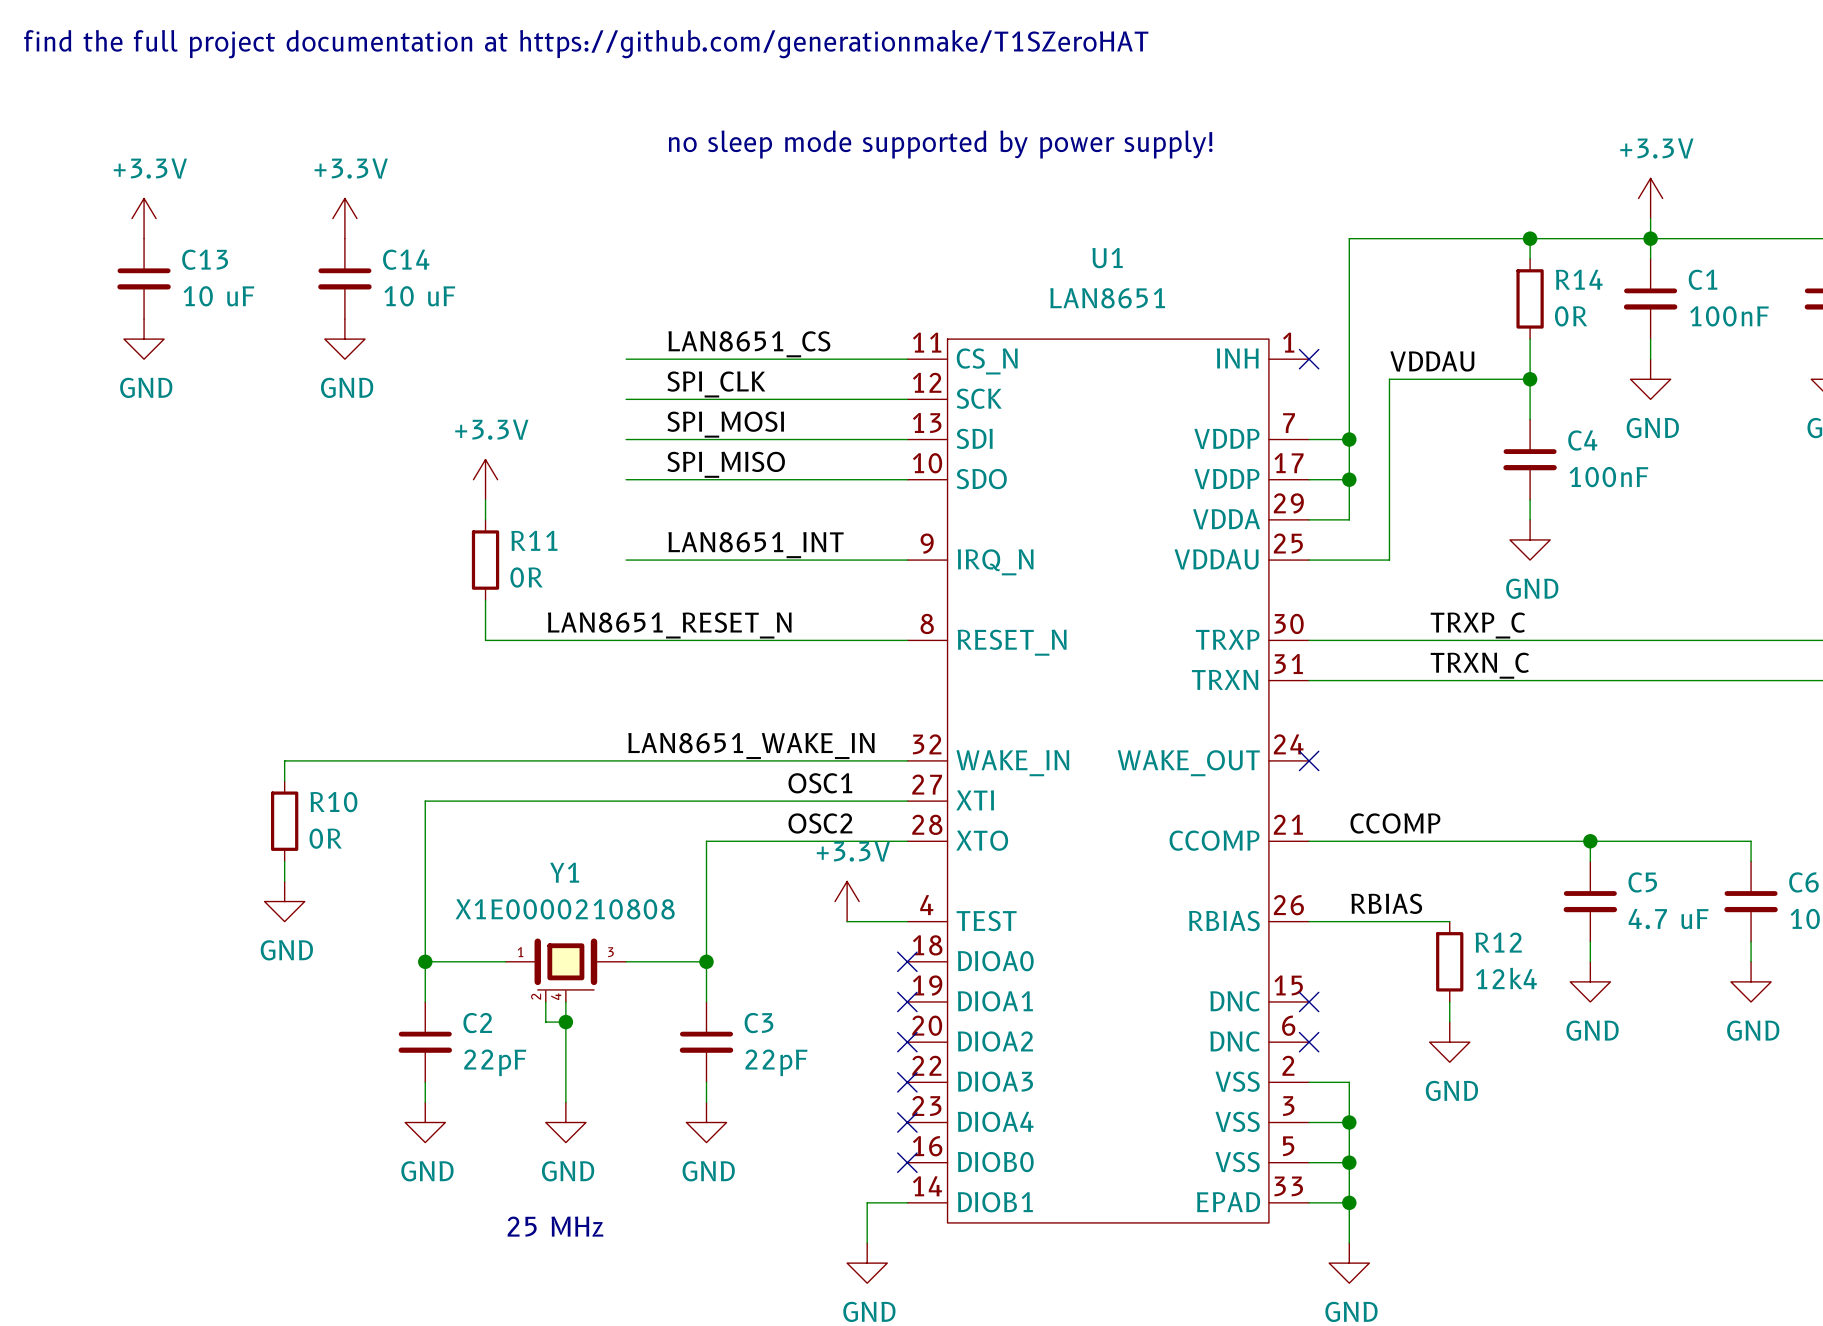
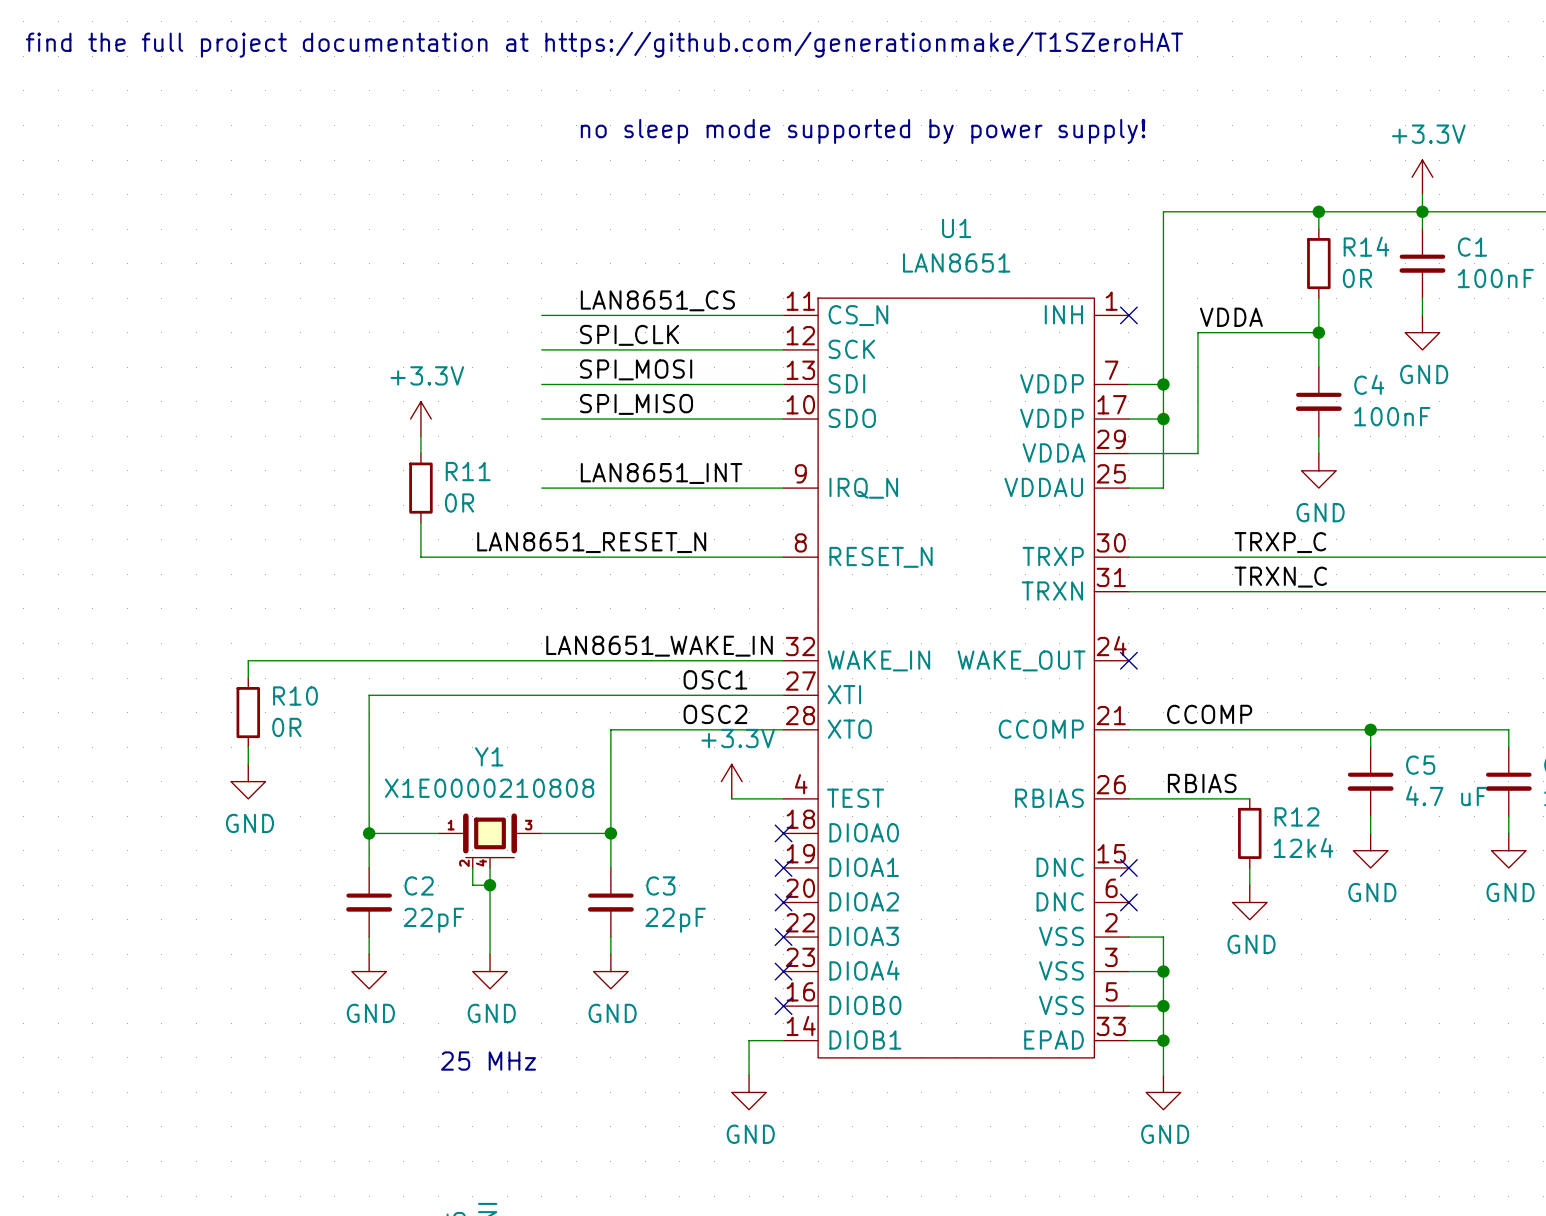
power symbol: +3.3V (144, 218) -> none
power symbol: +3.3V (344, 218) -> none
C13: 10 uF (144, 278) -> none
C14: 10 uF (344, 278) -> none
power symbol: GND (144, 339) -> none
power symbol: GND (344, 339) -> none
label: VDDAU (1432, 361) -> VDDA (1231, 317)
wire: (1389, 519) (1389, 560) (1349, 560) -> (1197, 453) (1163, 453) (1163, 488)

